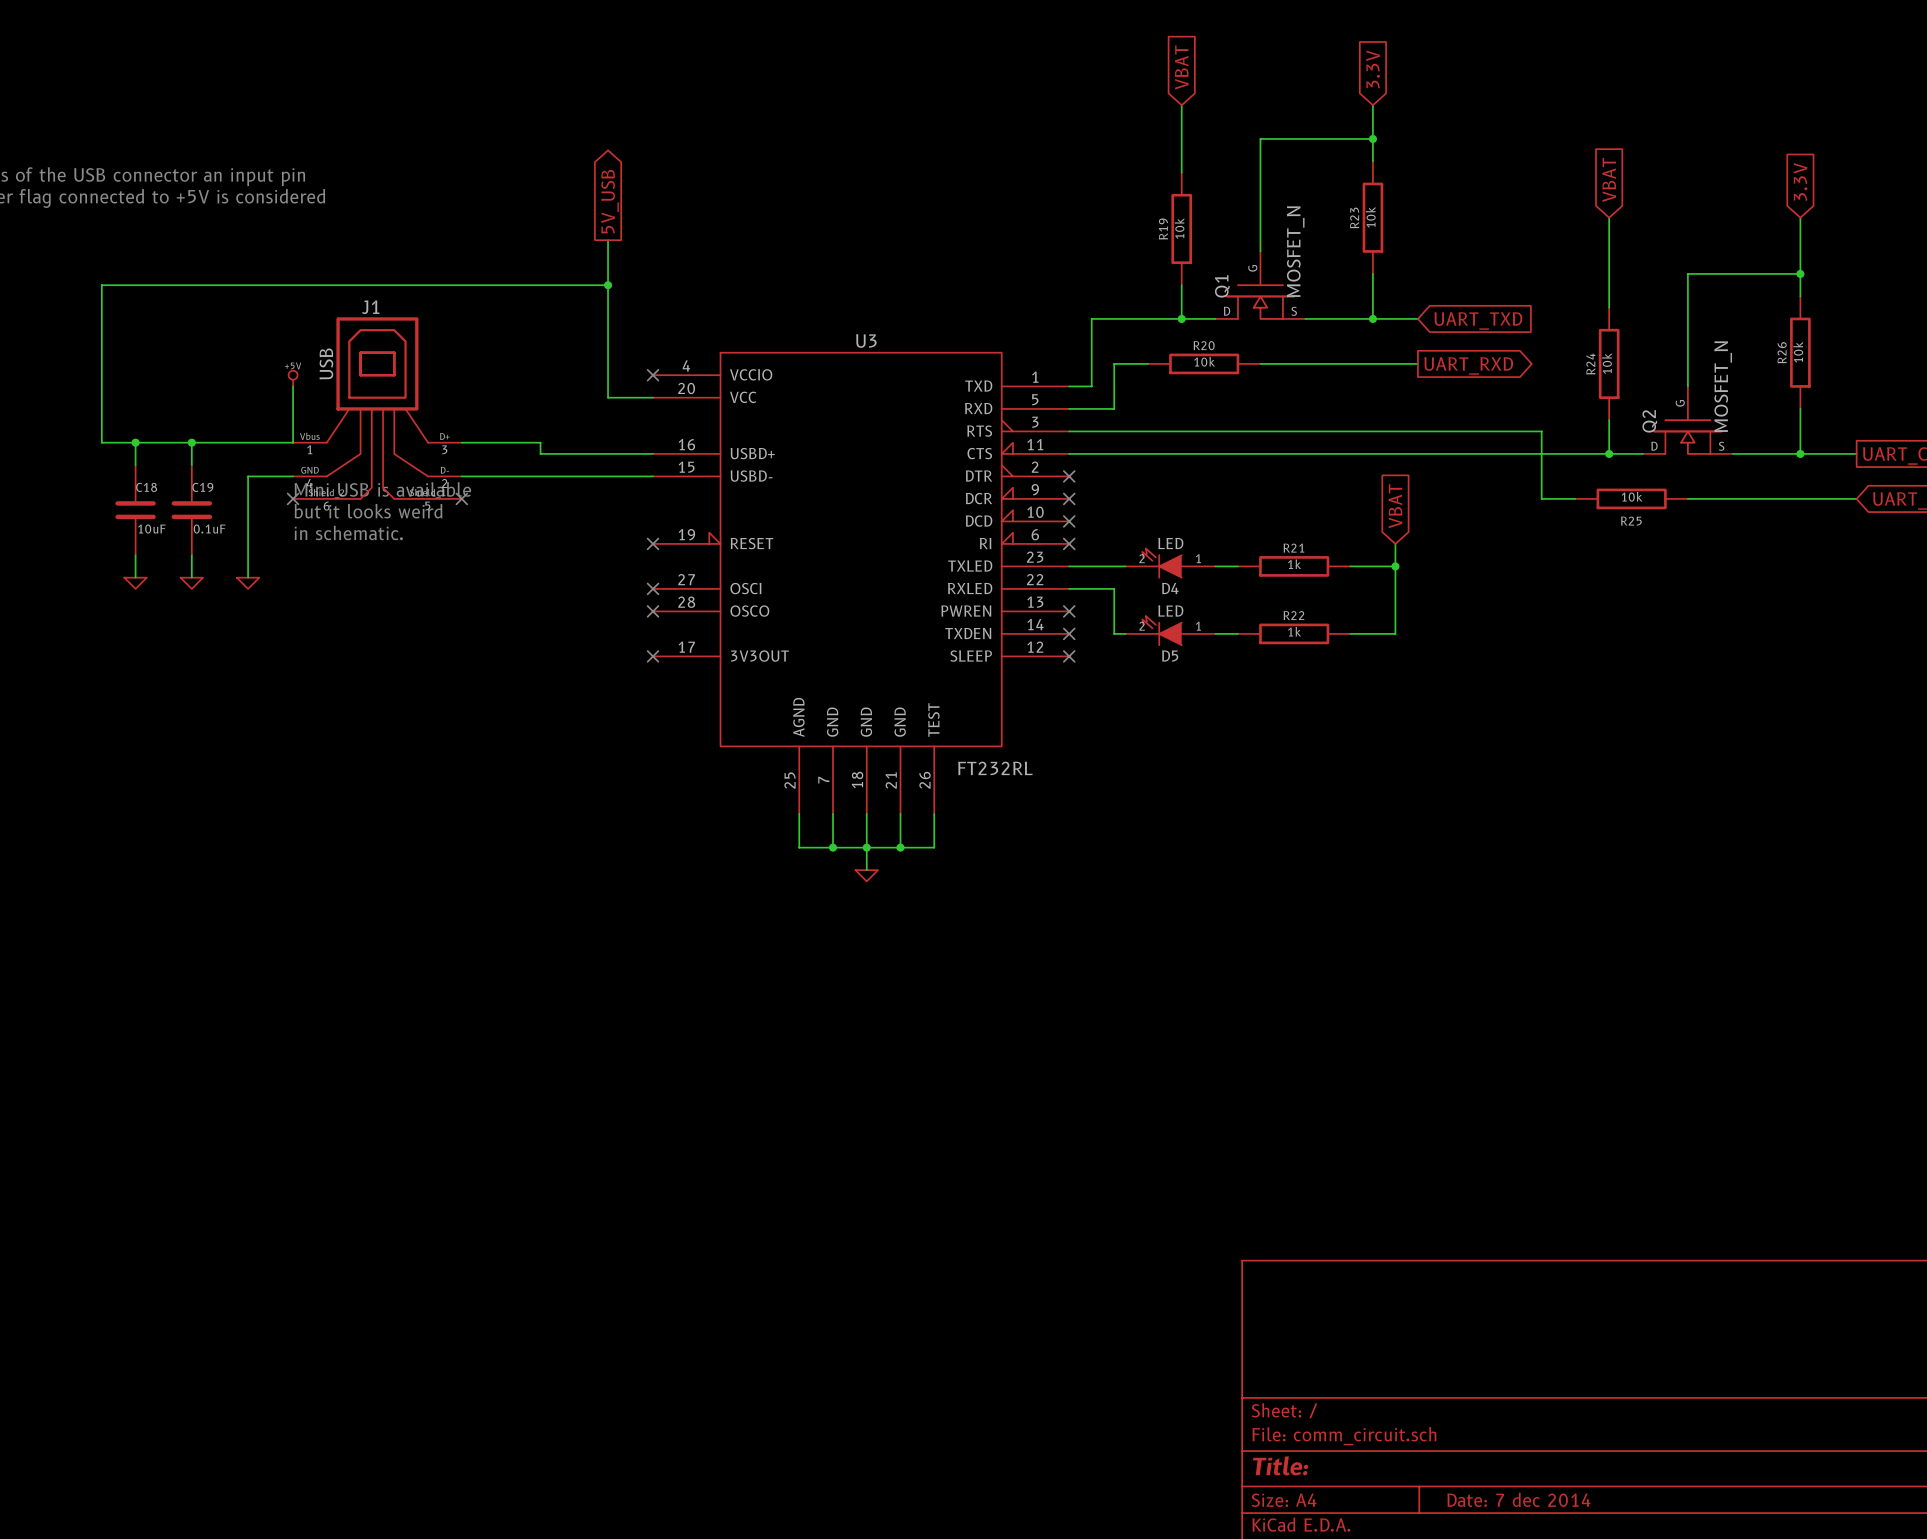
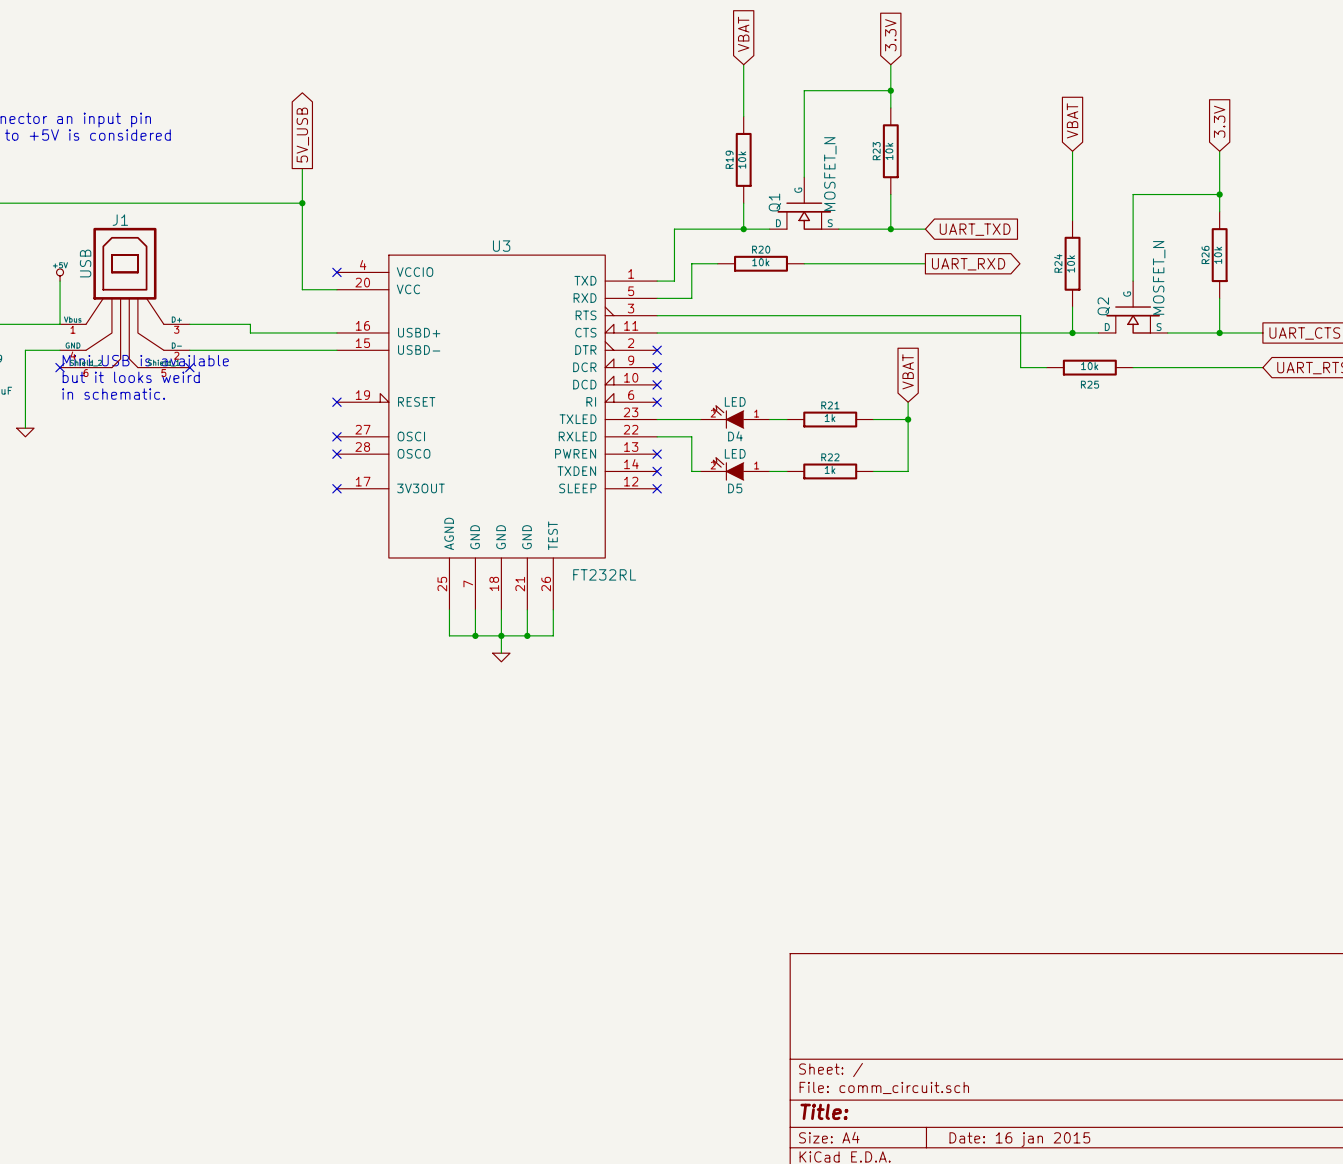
title block: Date: 7 dec 2014 (1518, 1499) -> Date: 16 jan 2015 (1019, 1139)

